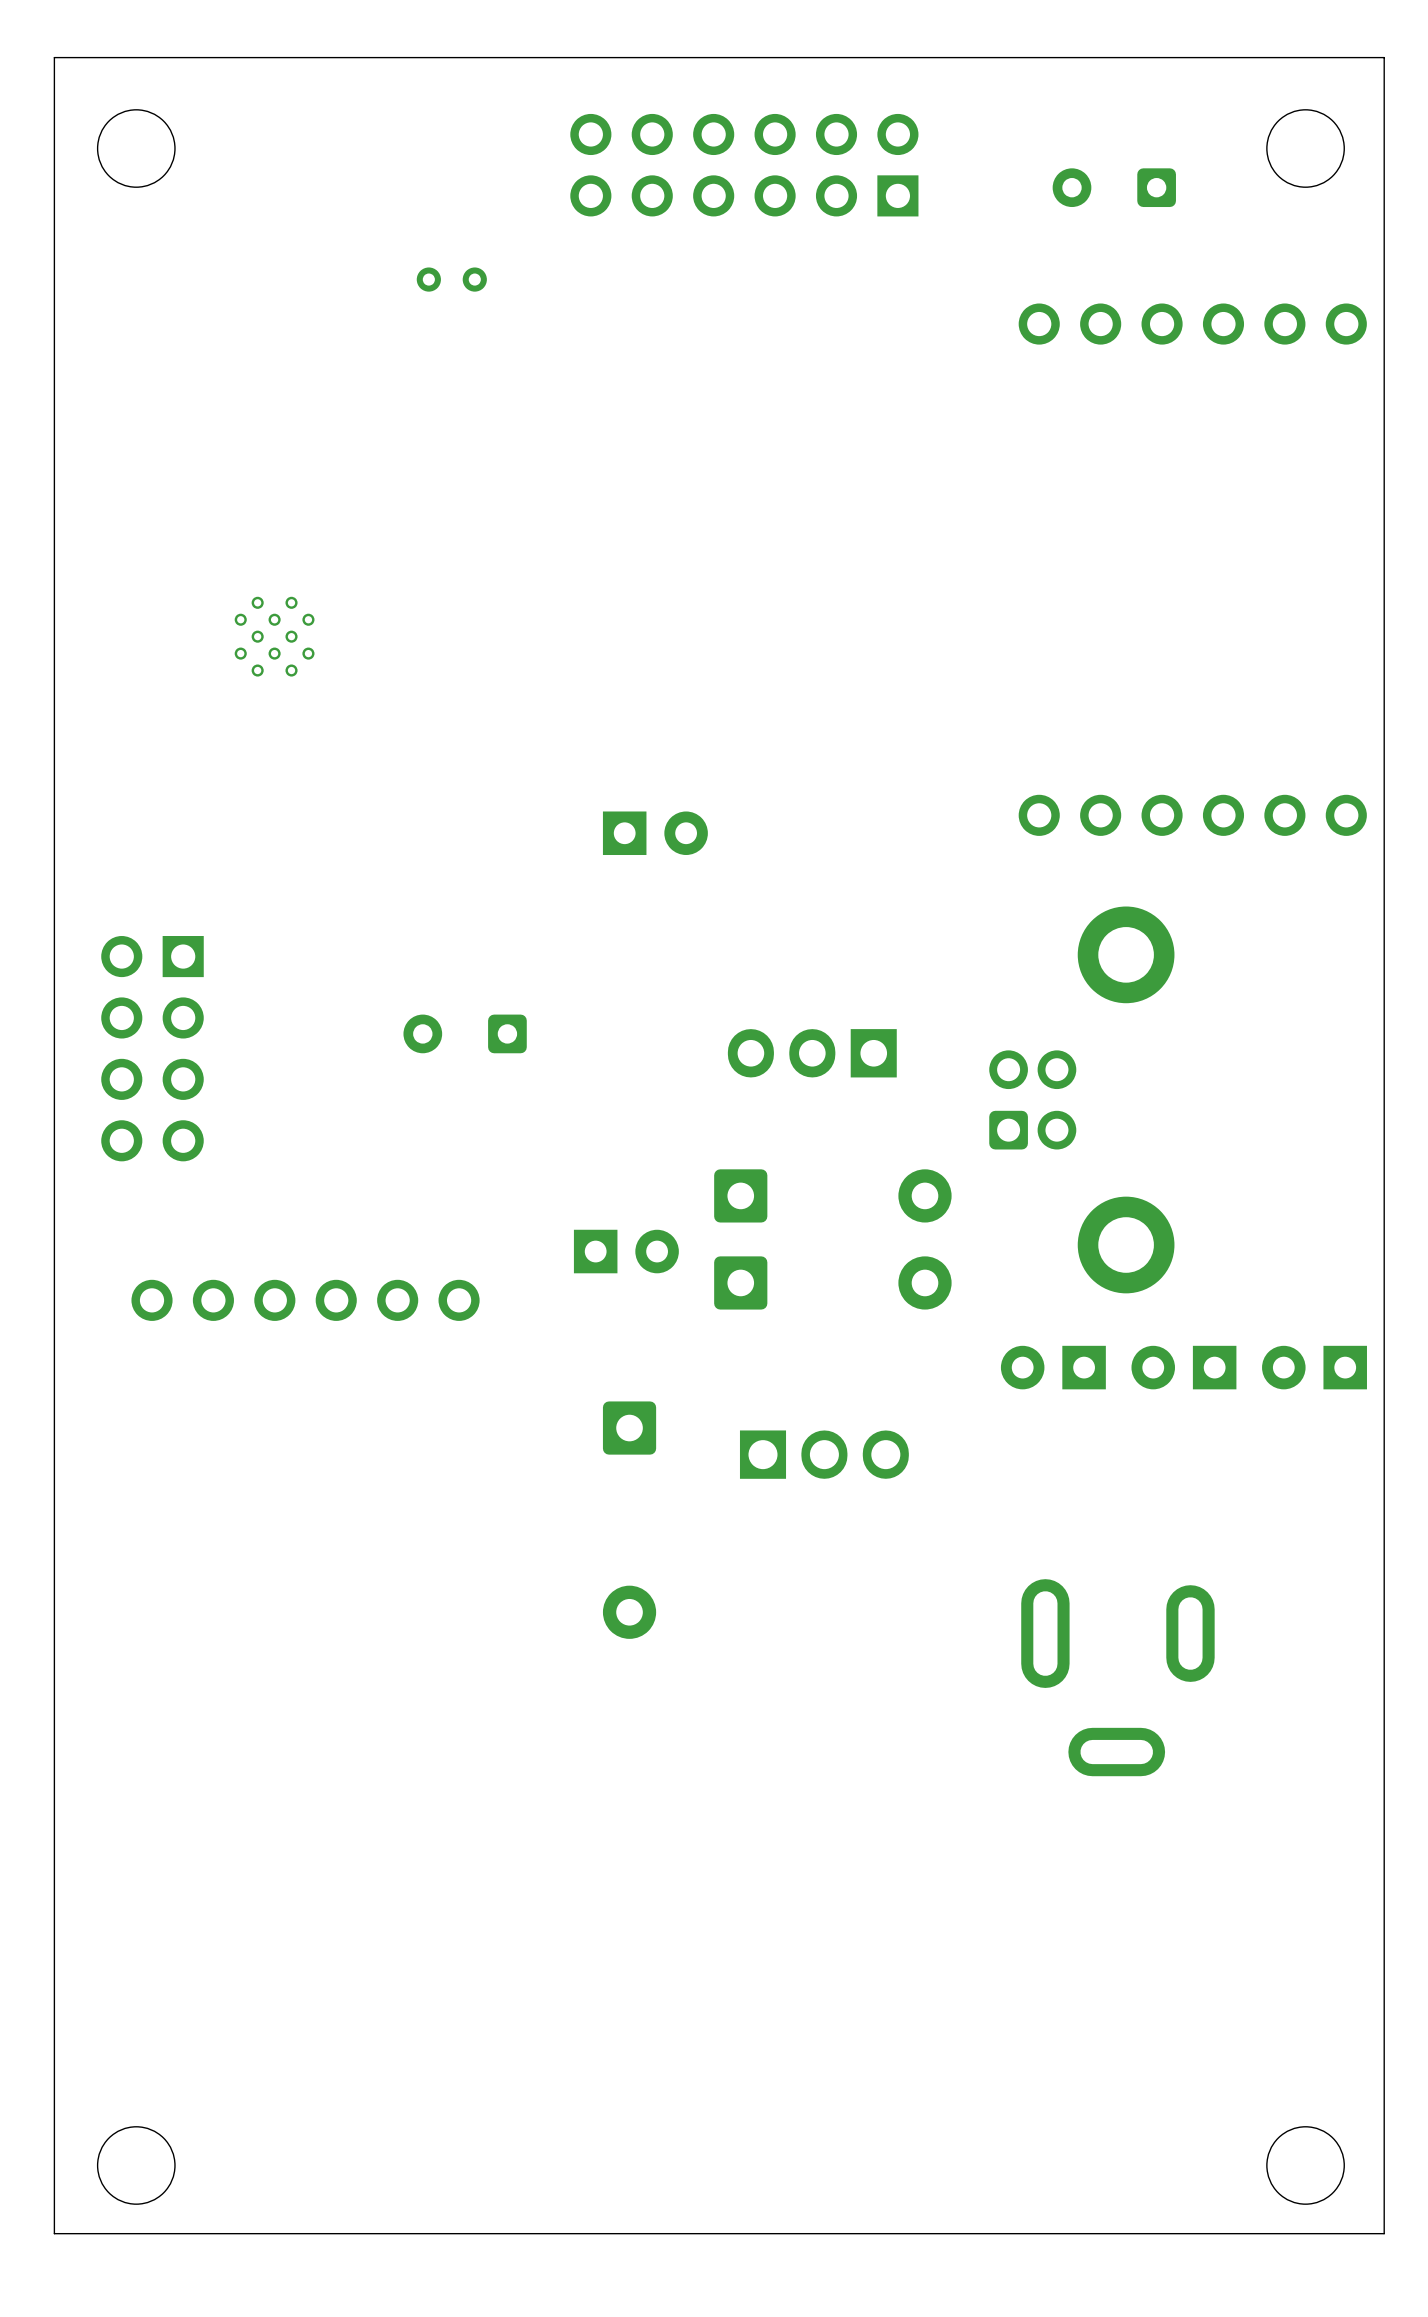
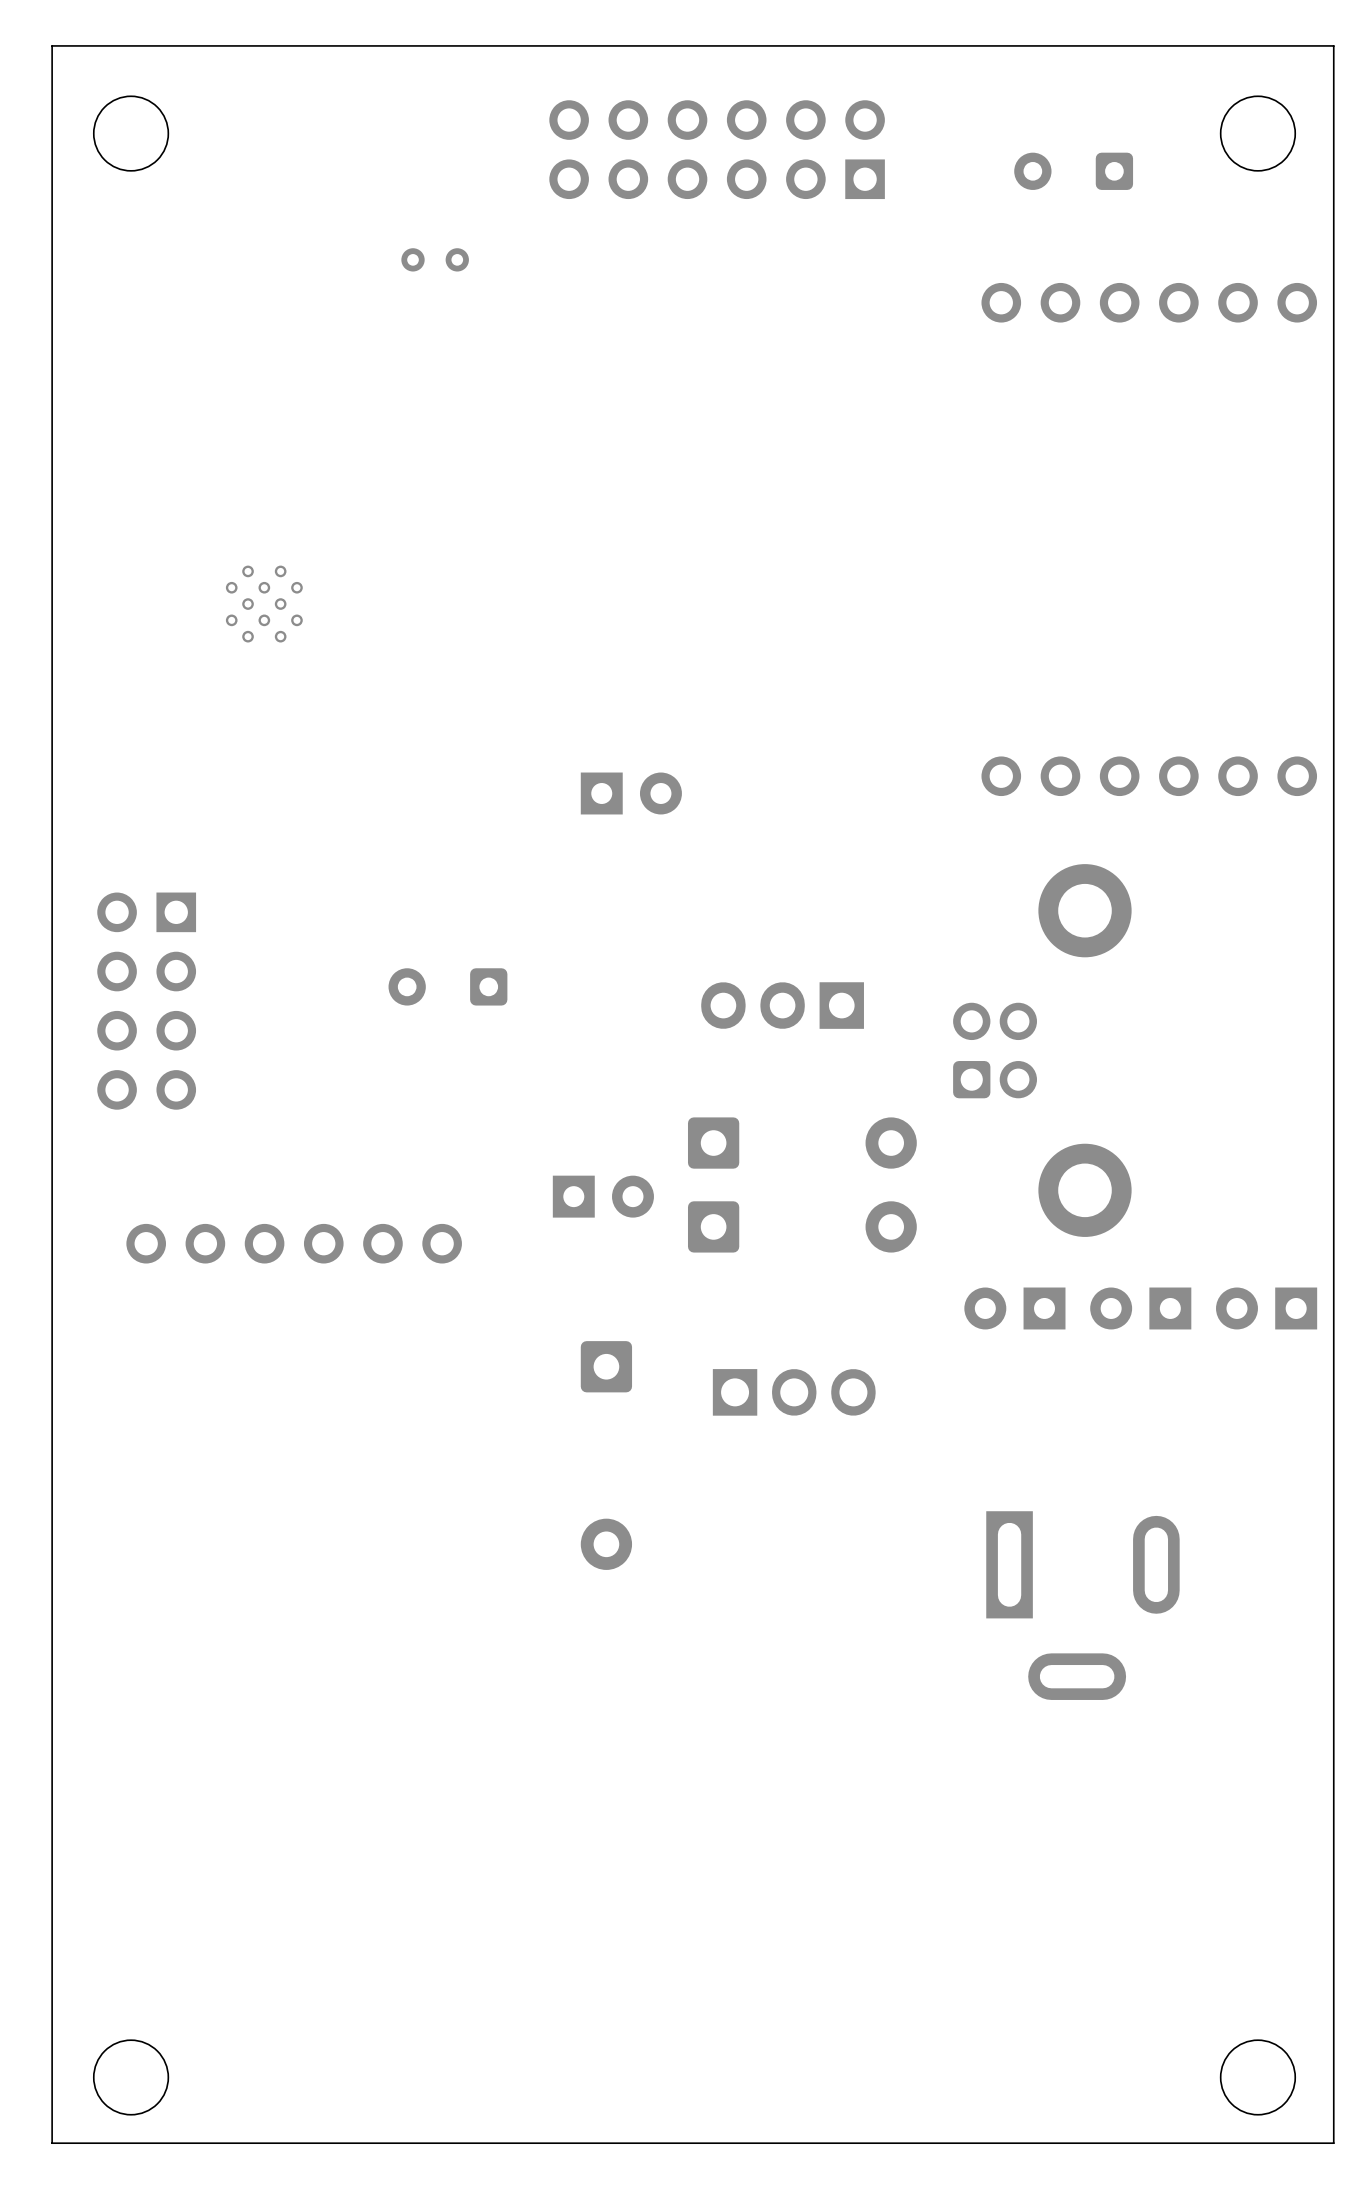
part footprint: [1021, 1579, 1215, 1777] -> [986, 1511, 1180, 1700]

